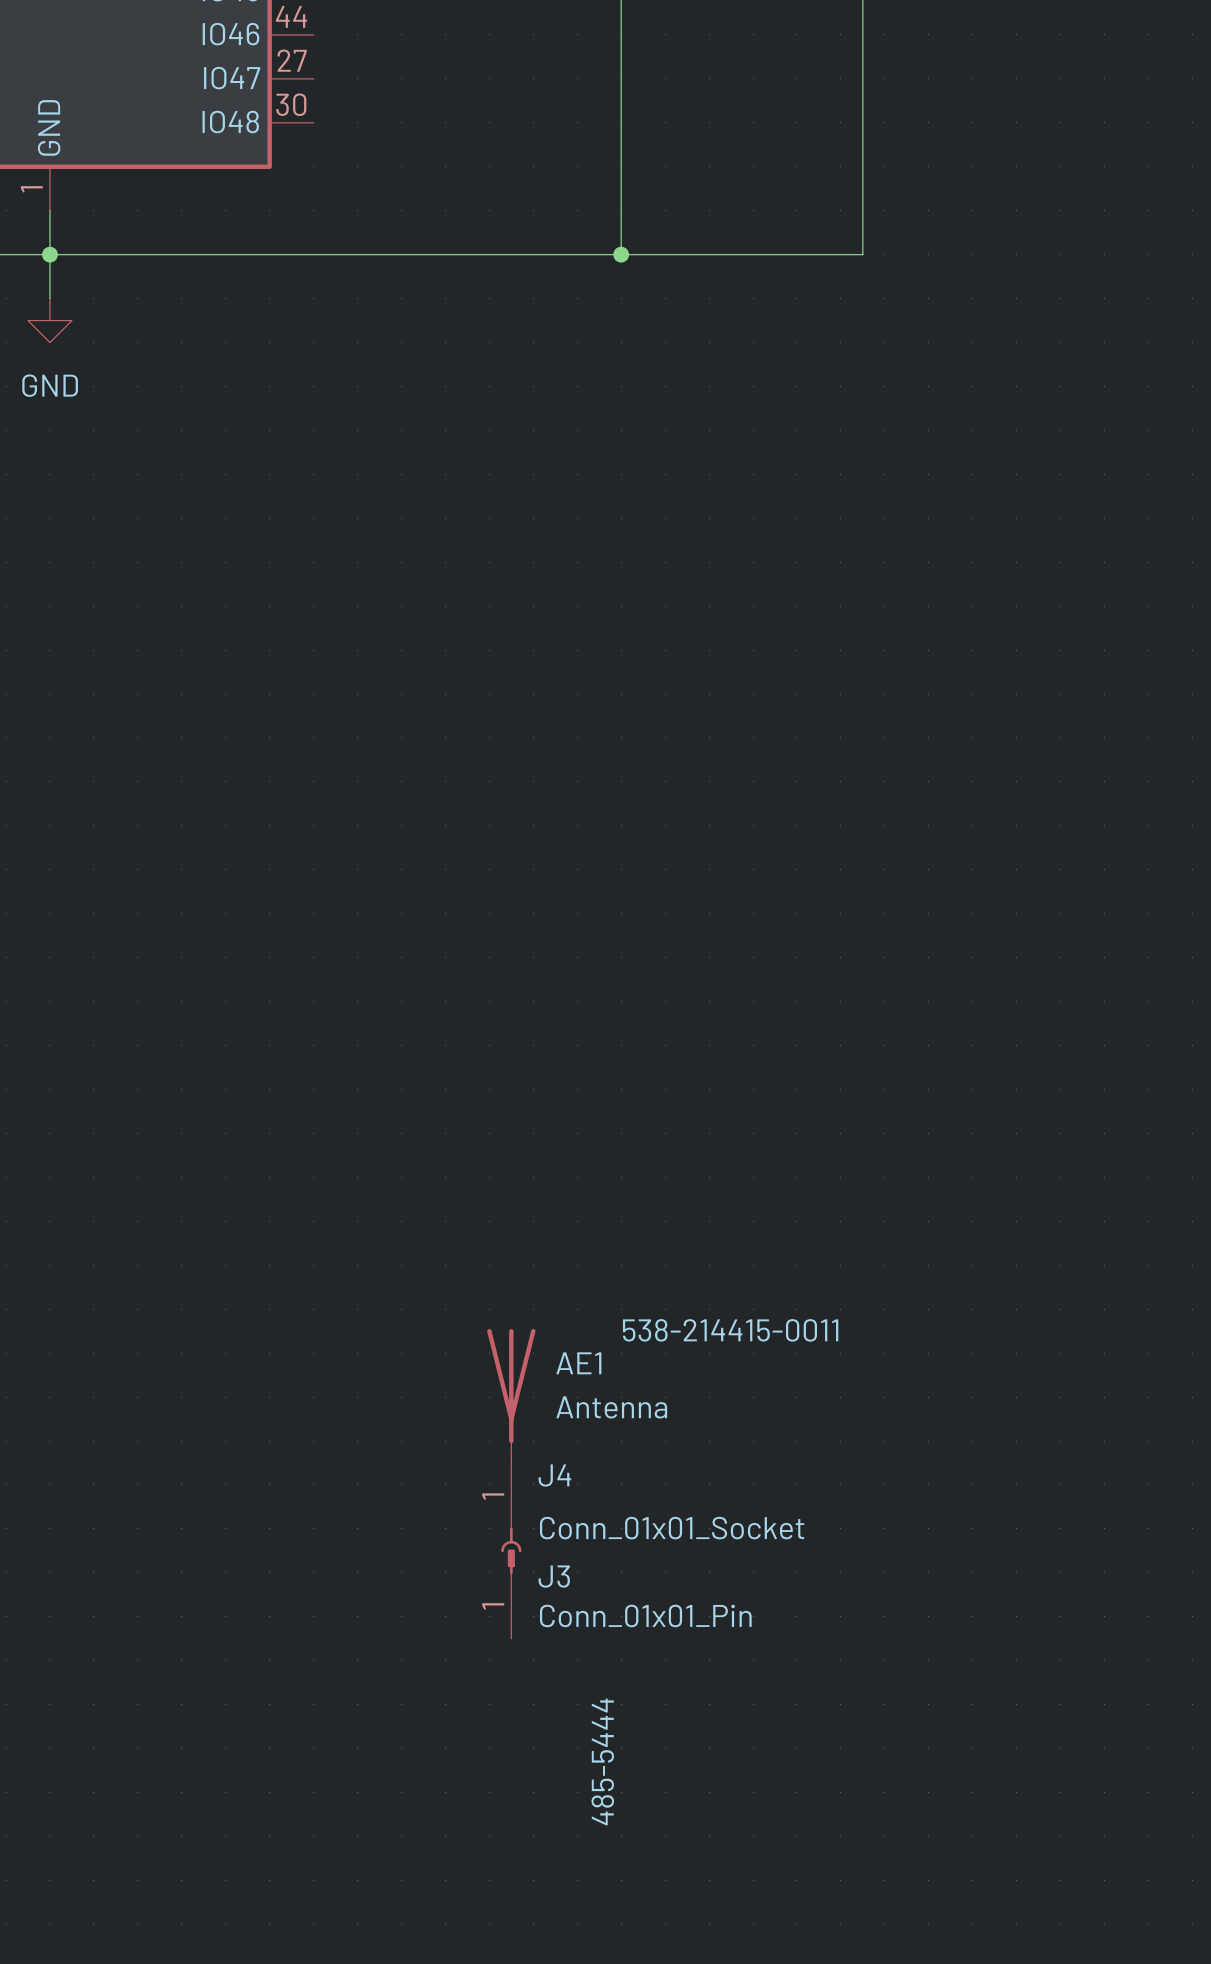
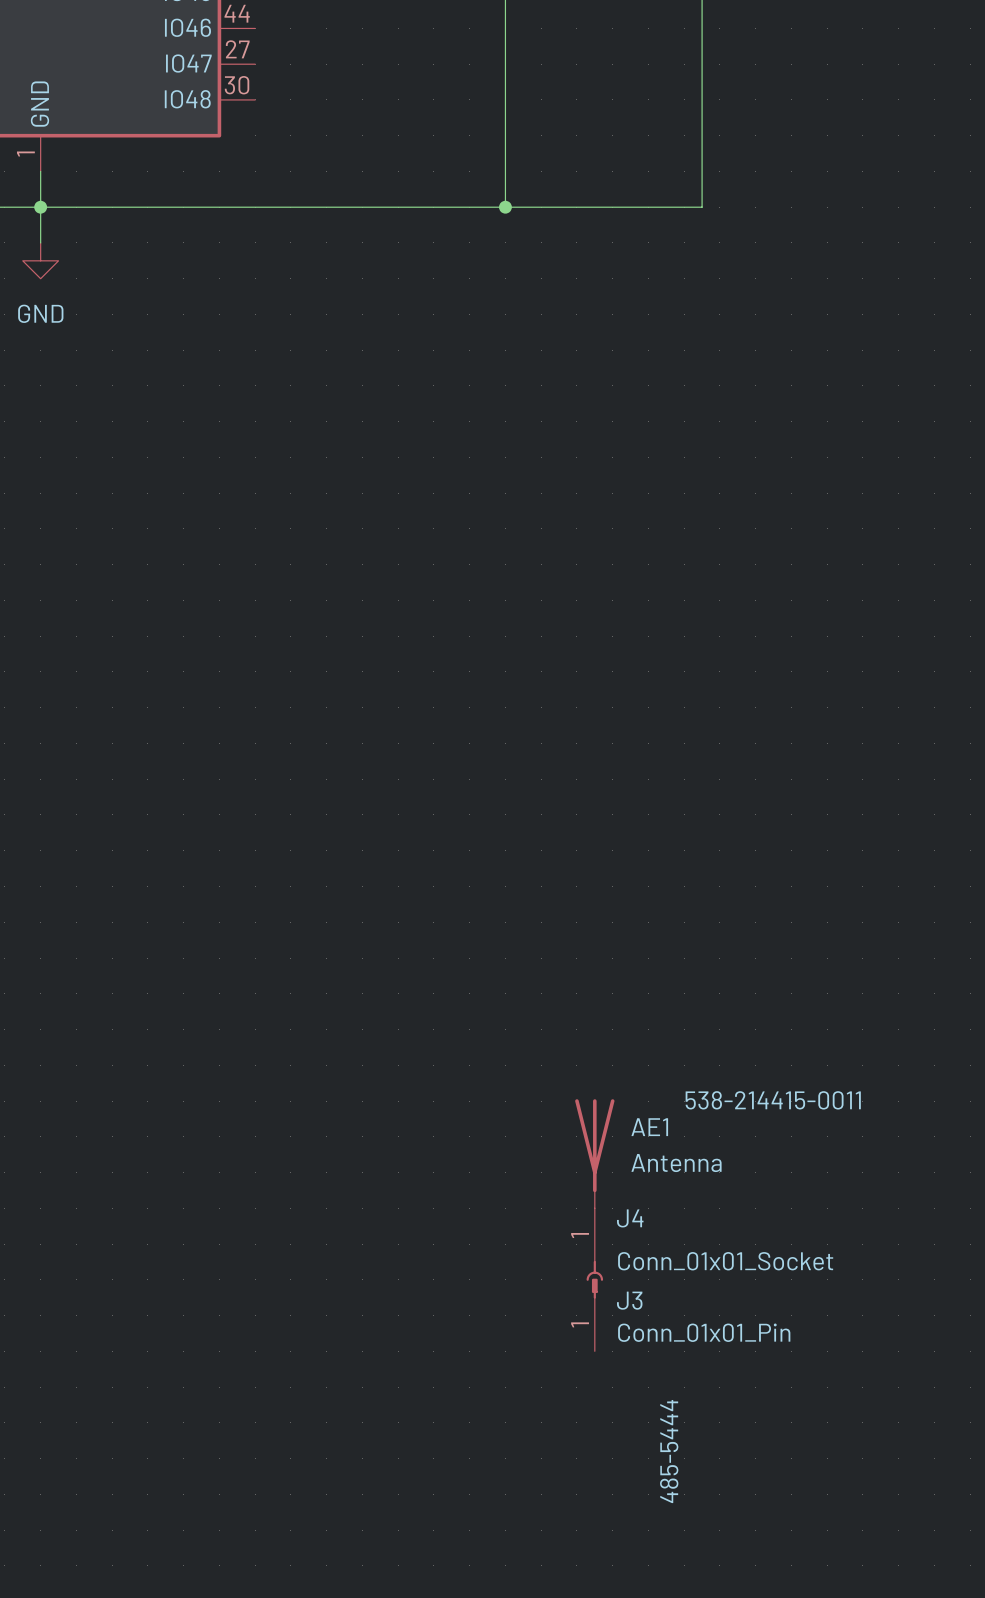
AE1 position: (511, 1395) -> (594, 1153)
J4 position: (511, 1507) -> (594, 1244)
J3 position: (511, 1594) -> (594, 1314)

